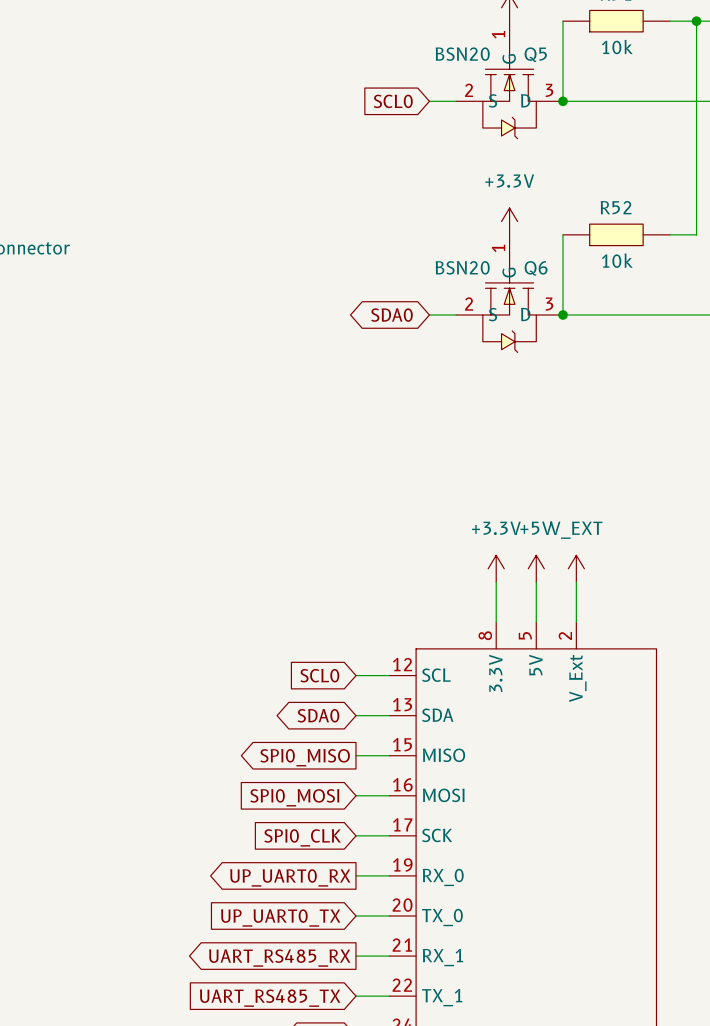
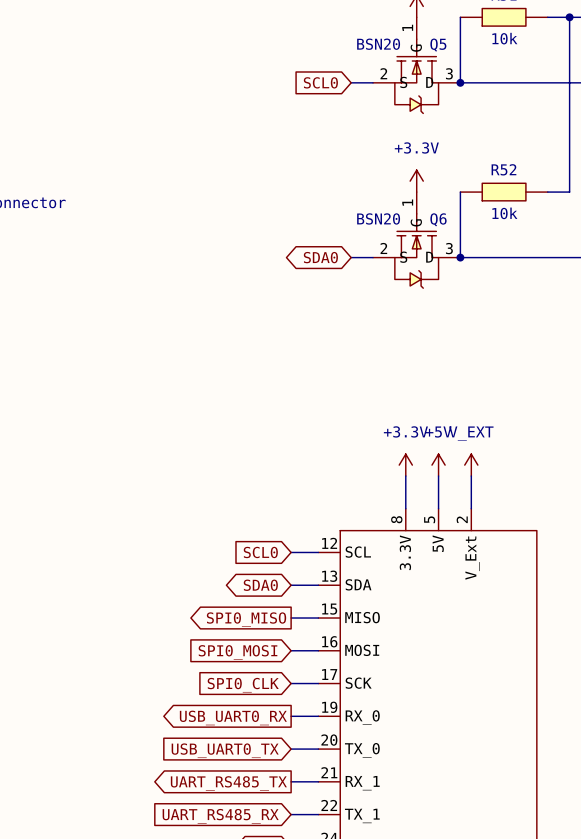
global label: UP_UART0_RX (290, 877) -> USB_UART0_RX (233, 717)
global label: UP_UART0_TX (280, 917) -> USB_UART0_TX (225, 750)
global label: UART_RS485_RX (279, 958) -> UART_RS485_TX (228, 783)
global label: UART_RS485_TX (270, 998) -> UART_RS485_RX (220, 816)

